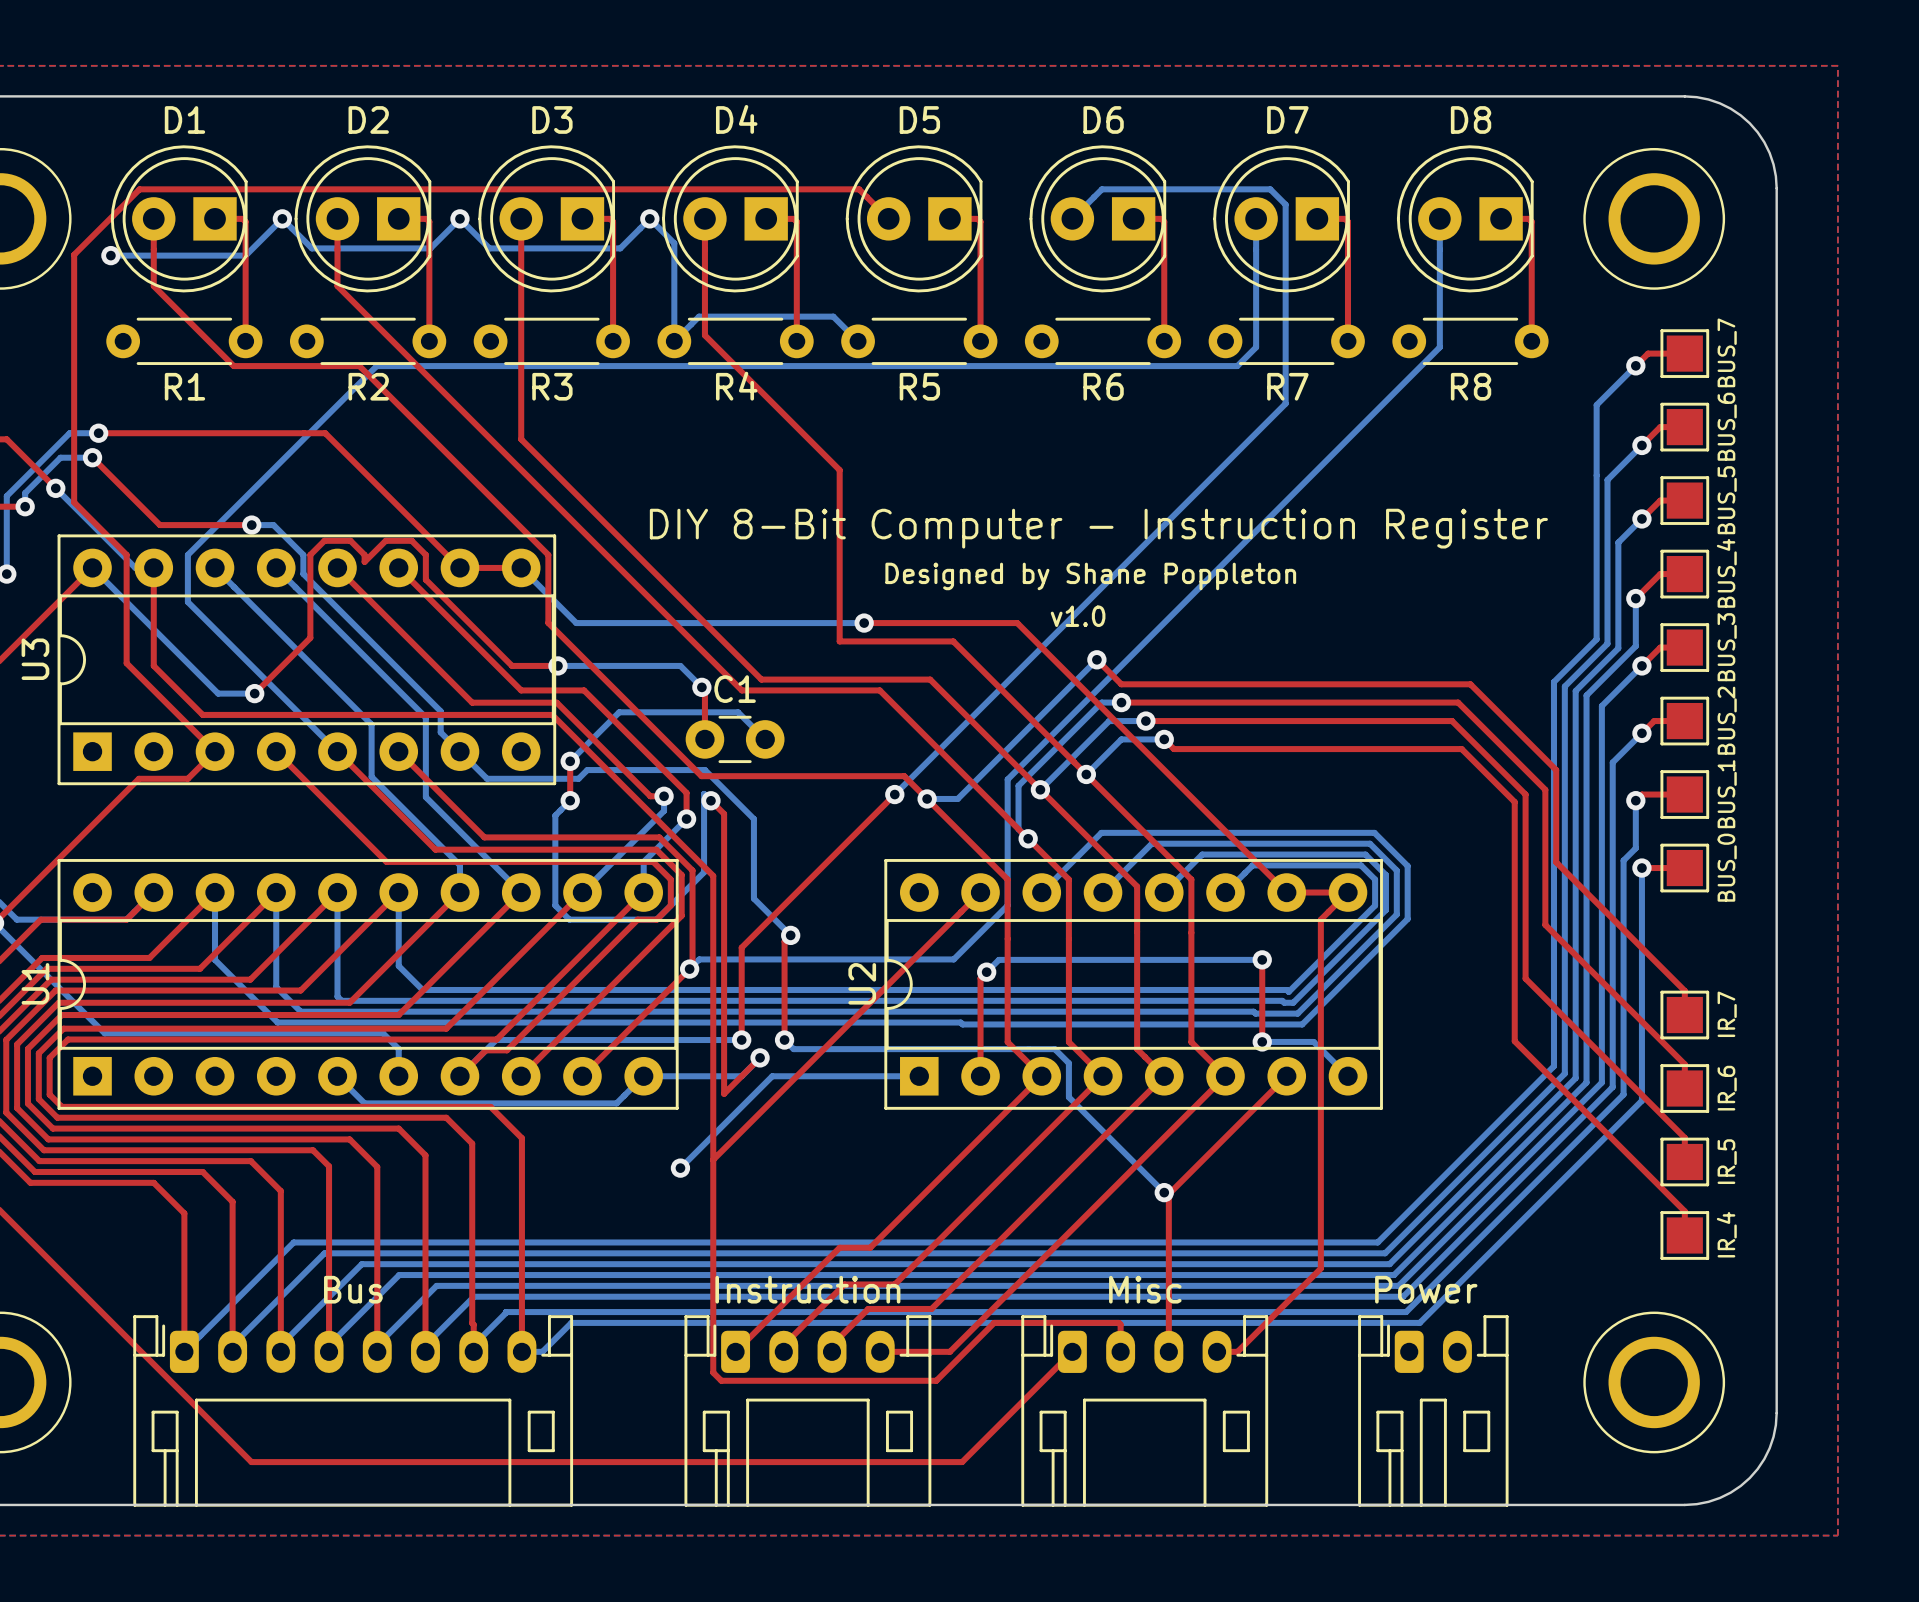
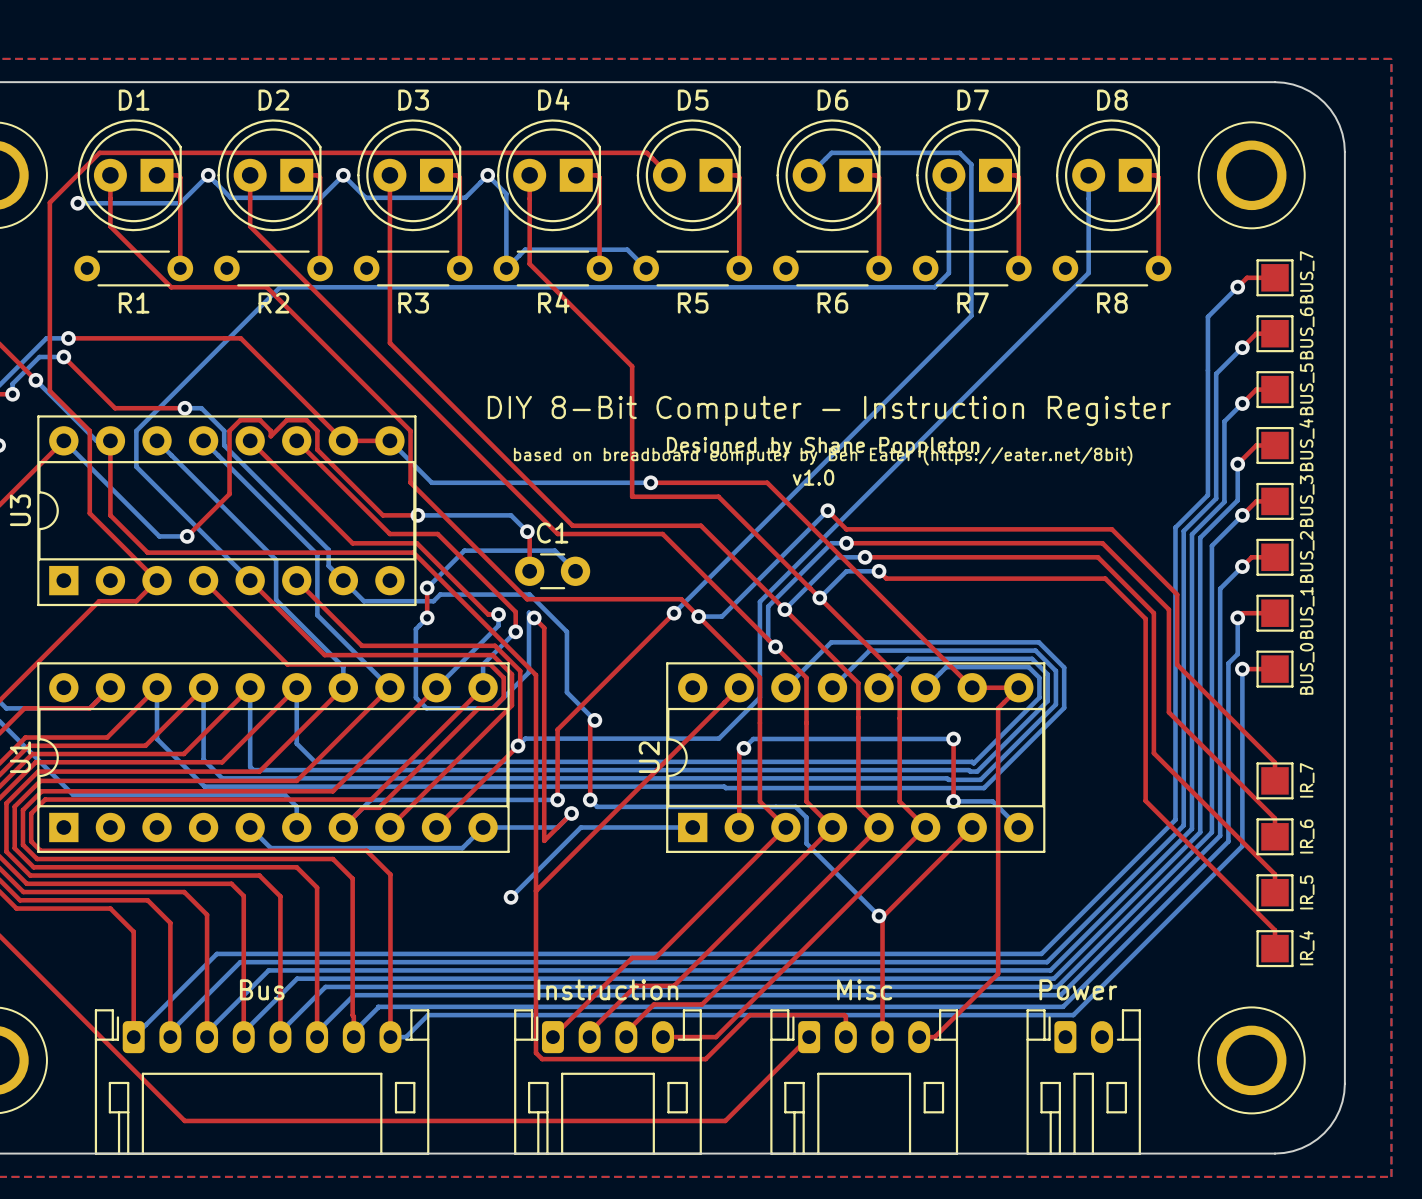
text: none -> based on breadboard computer by Ben Eater (https://eater.net/8bit) (823, 455)

